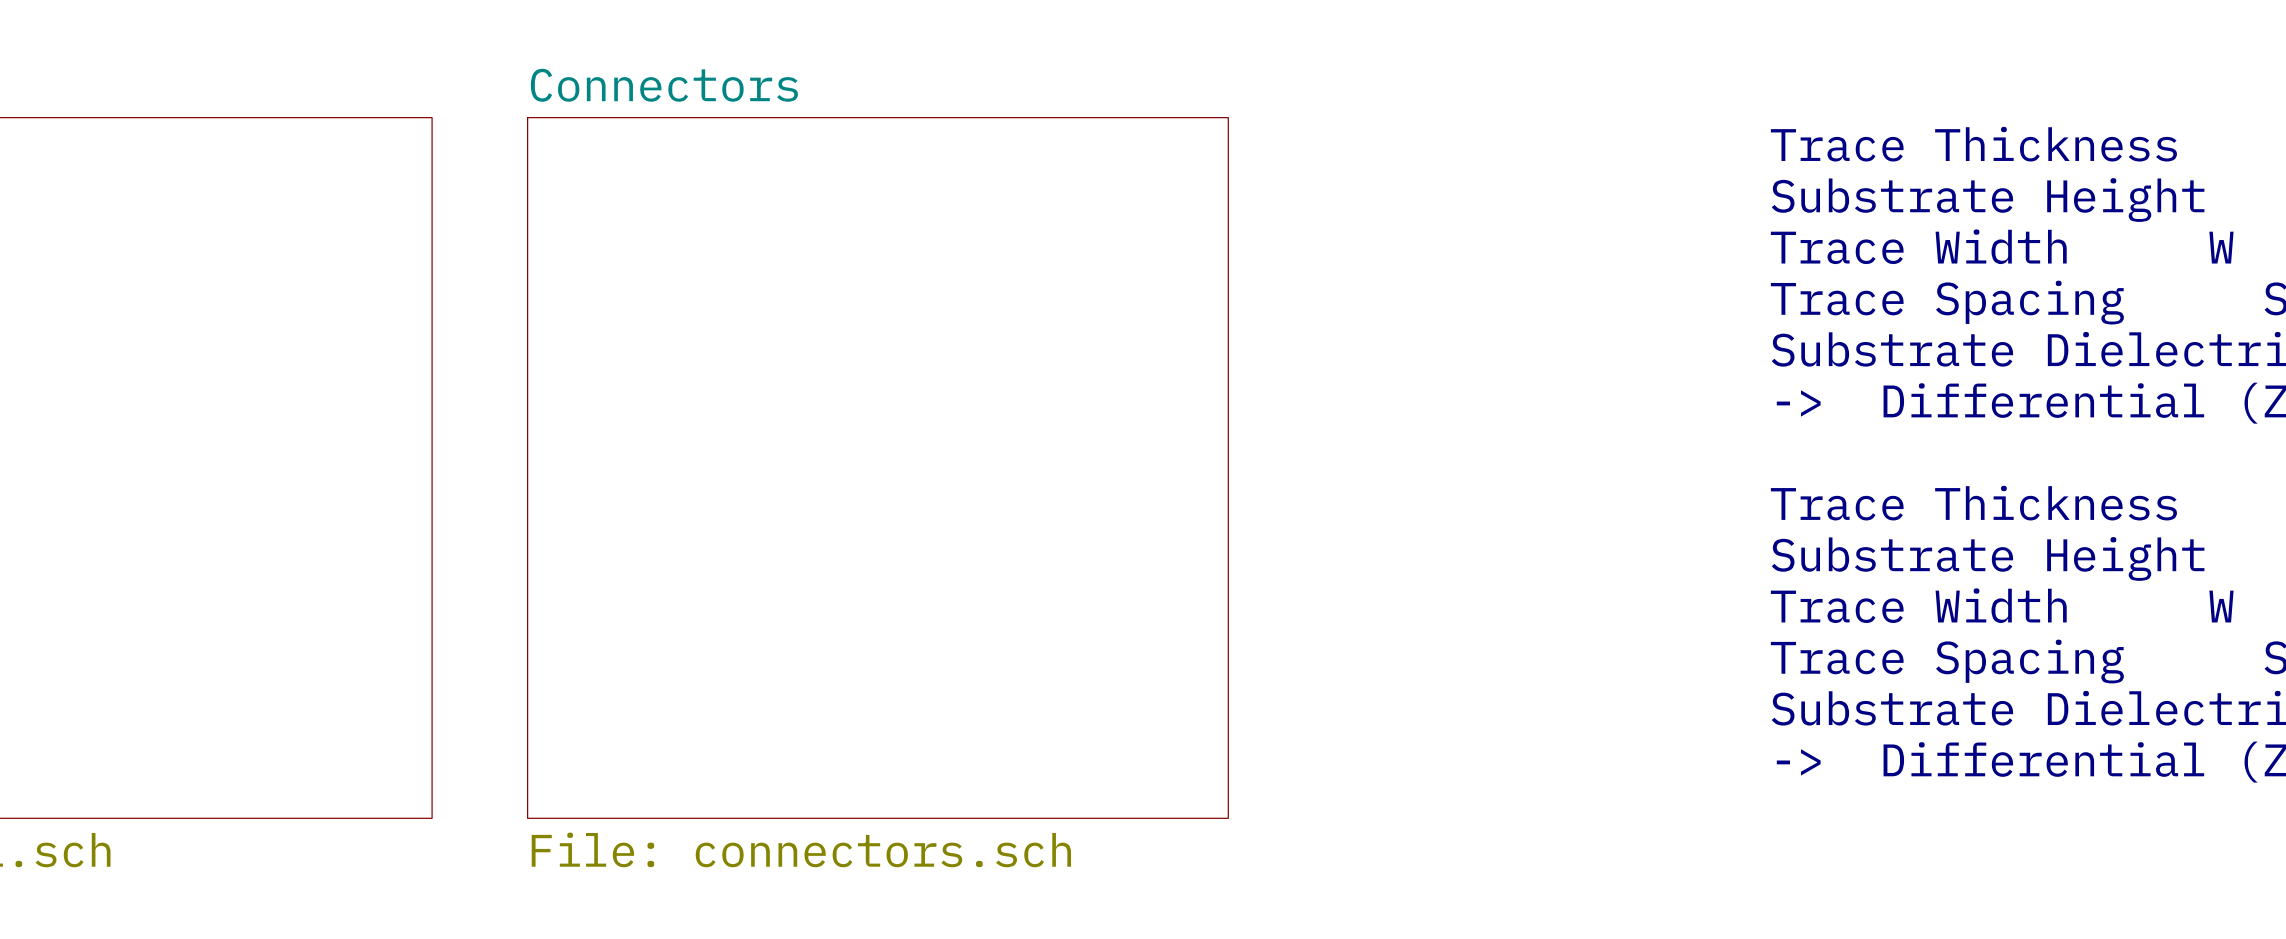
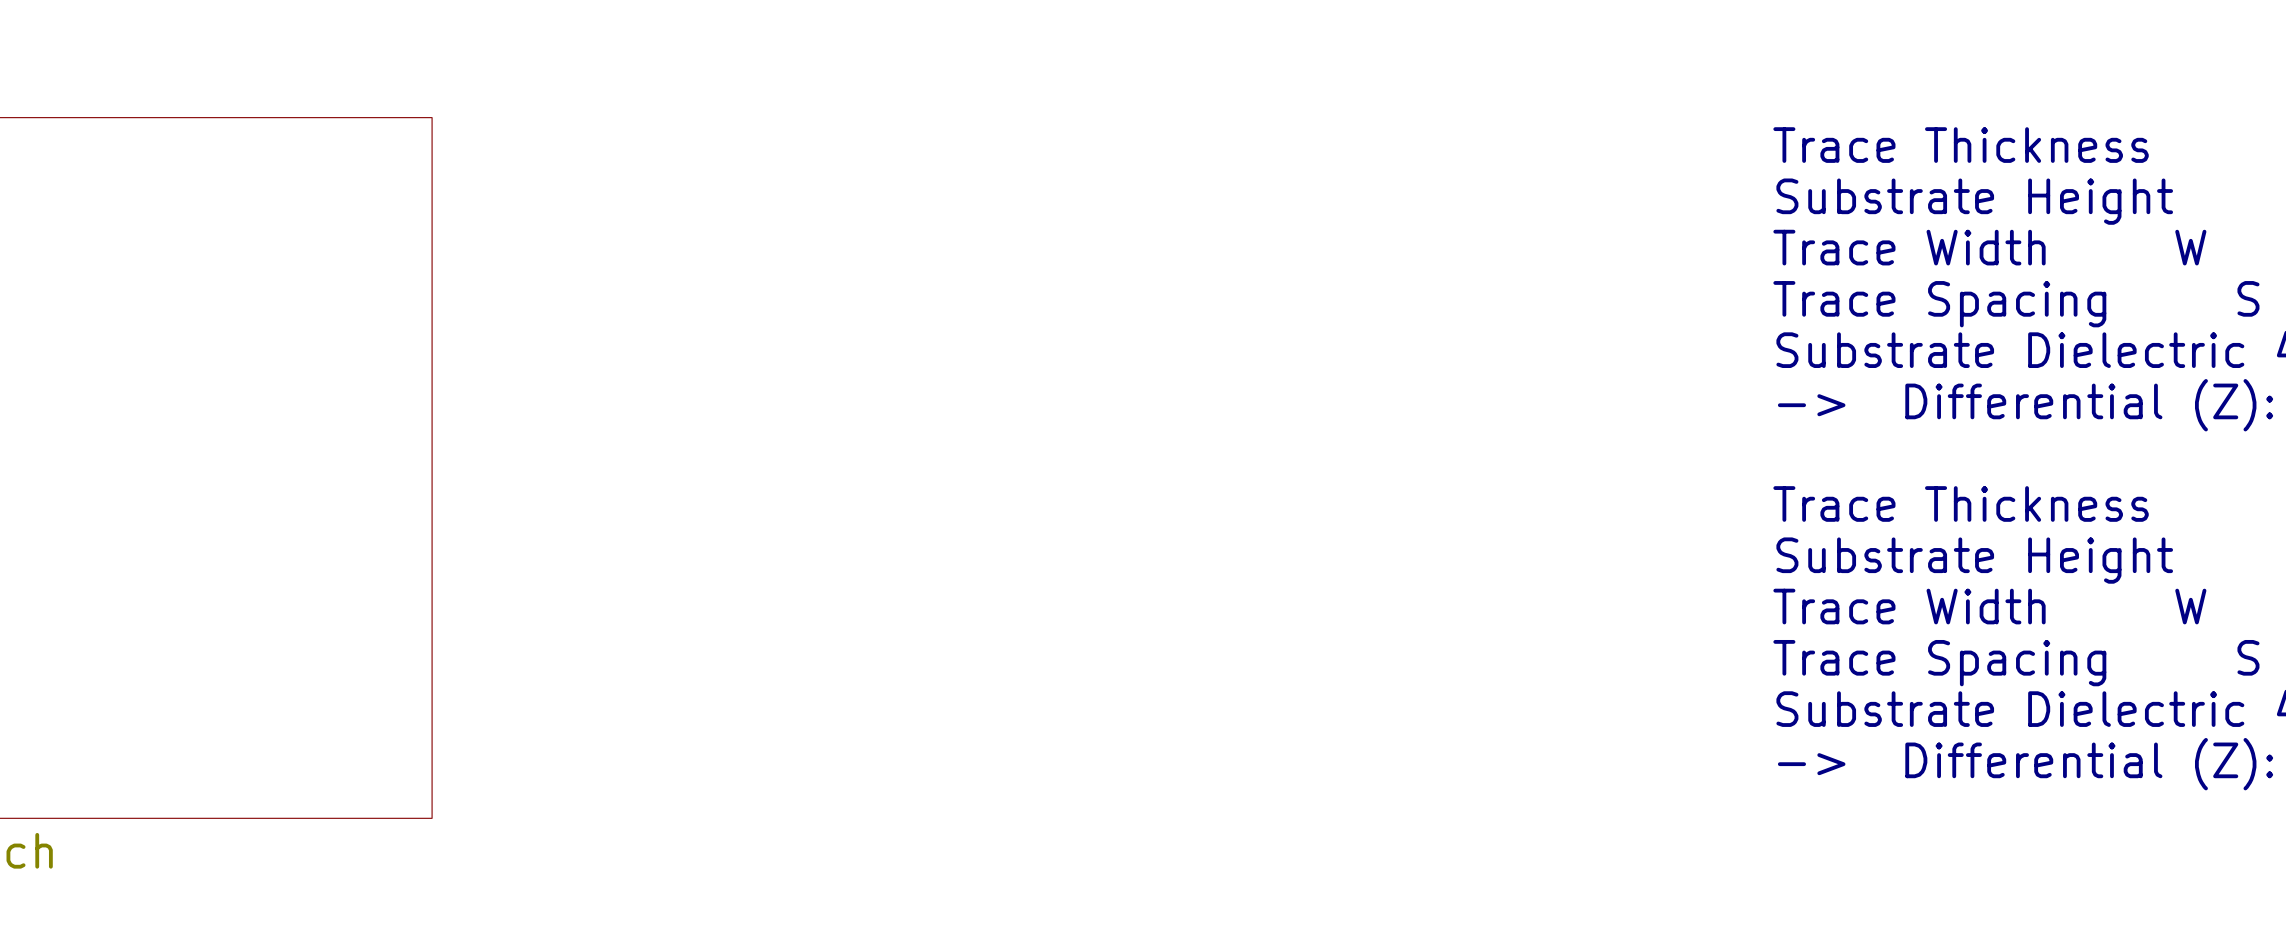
sheet Connectors: File: connectors.sch (877, 467) -> none

